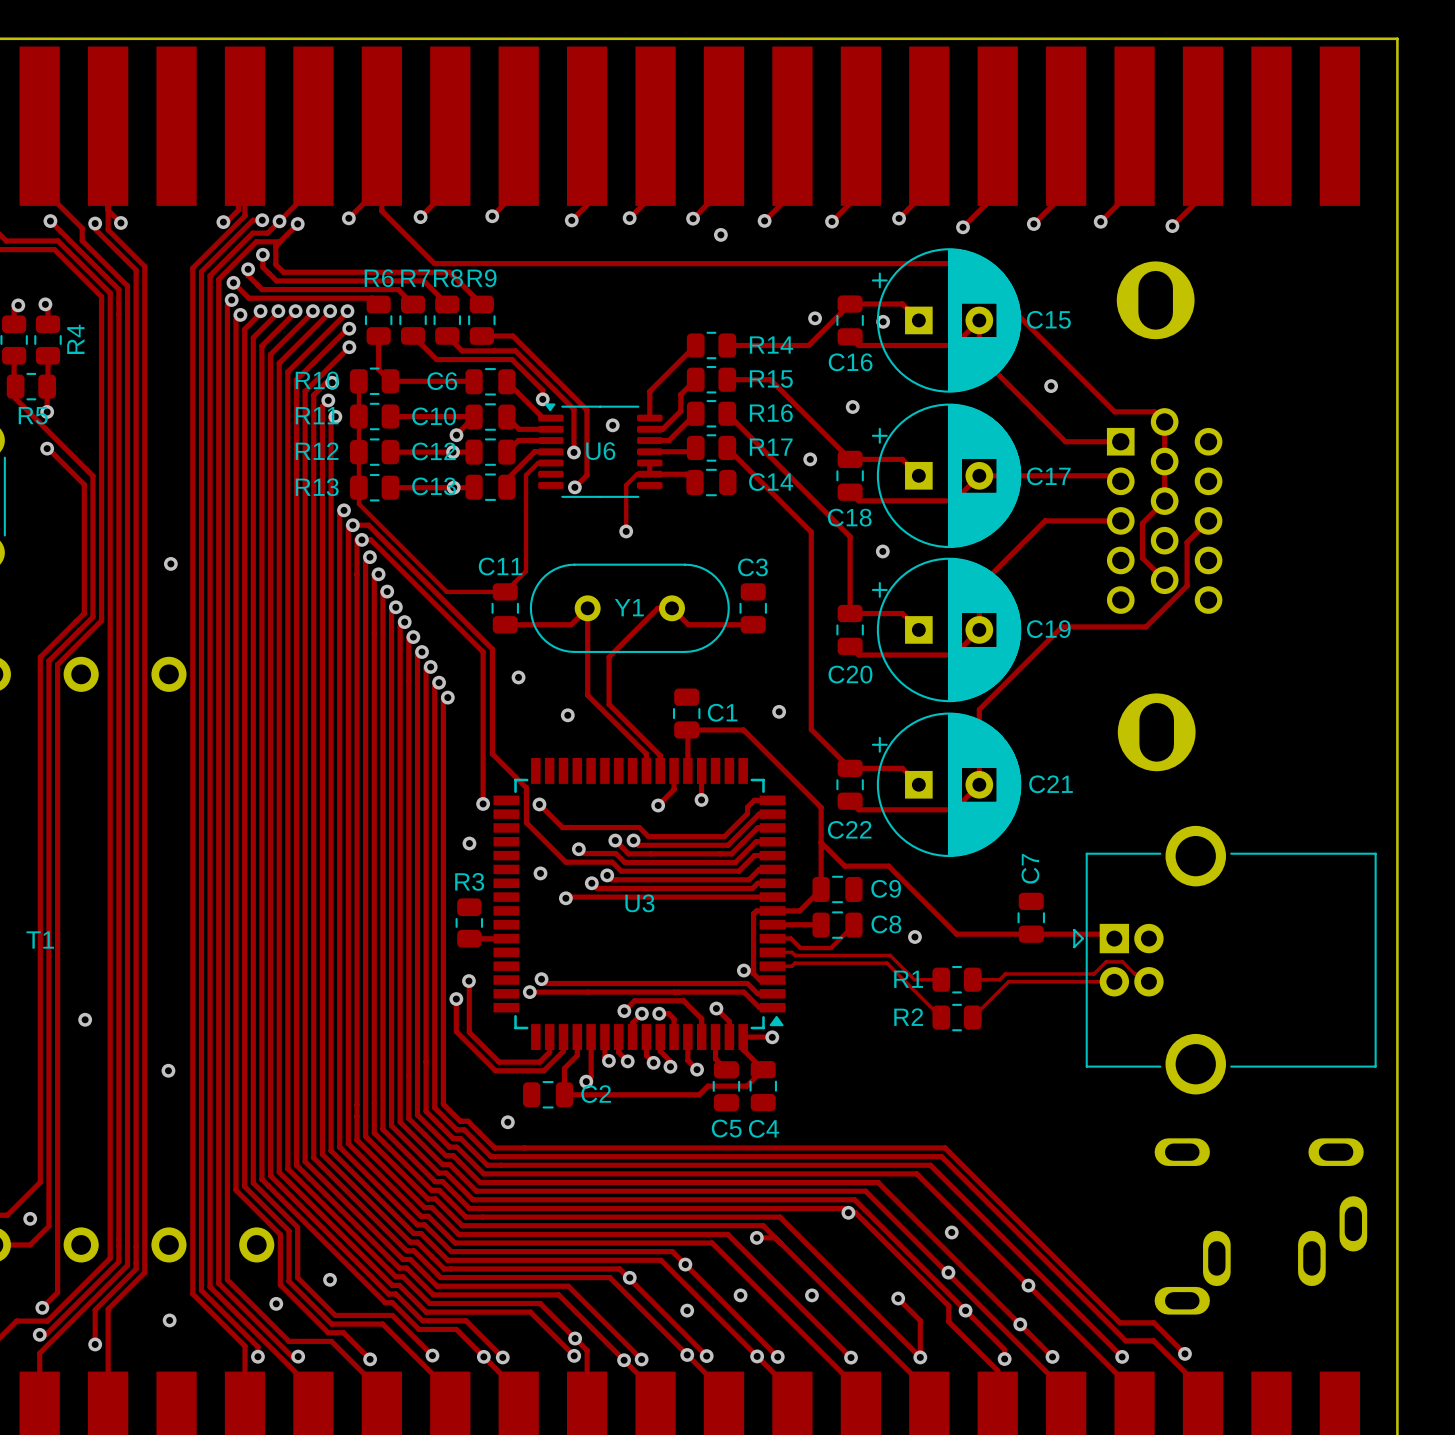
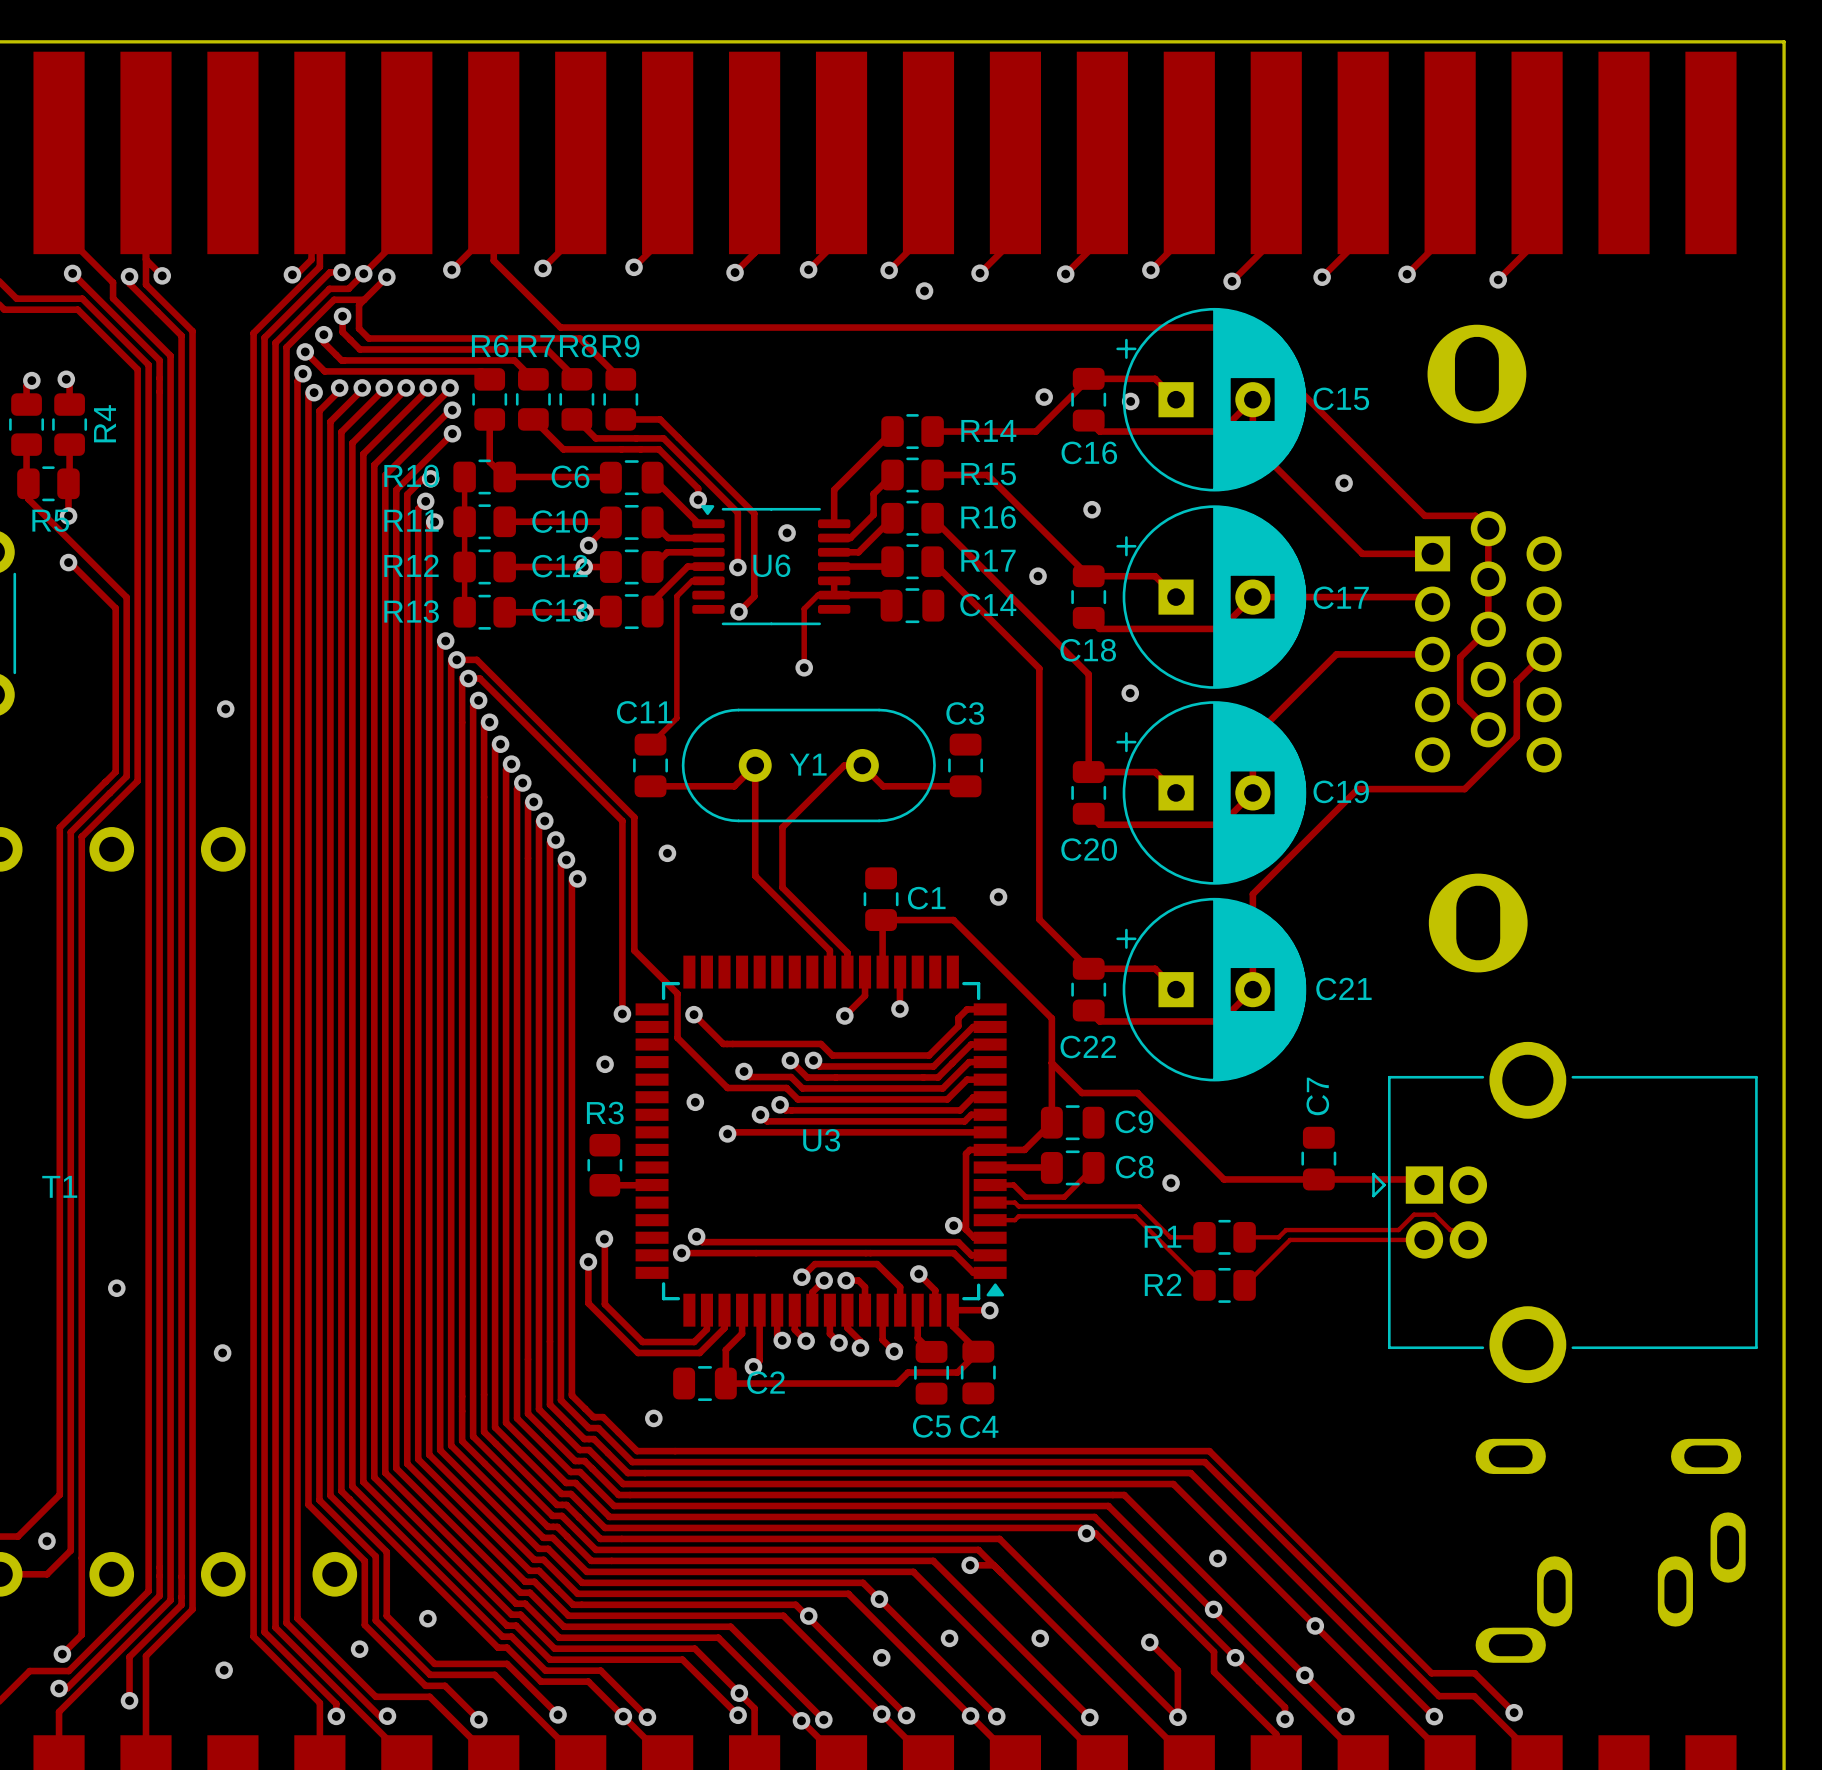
track: (358, 487) (358, 503) (446, 591) (505, 591) -> none
via: (567, 715) -> none

